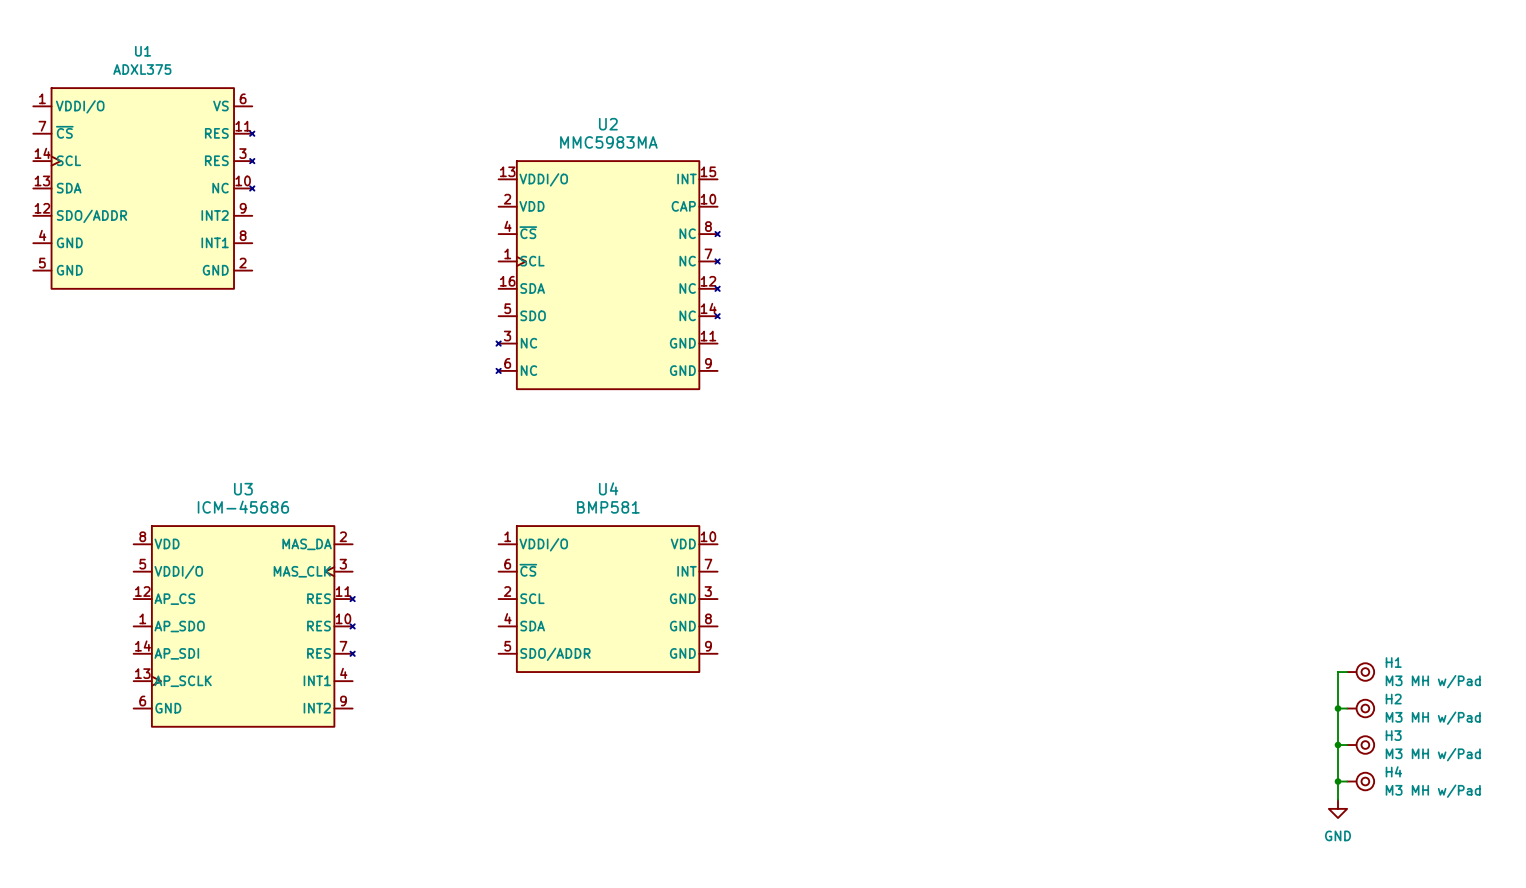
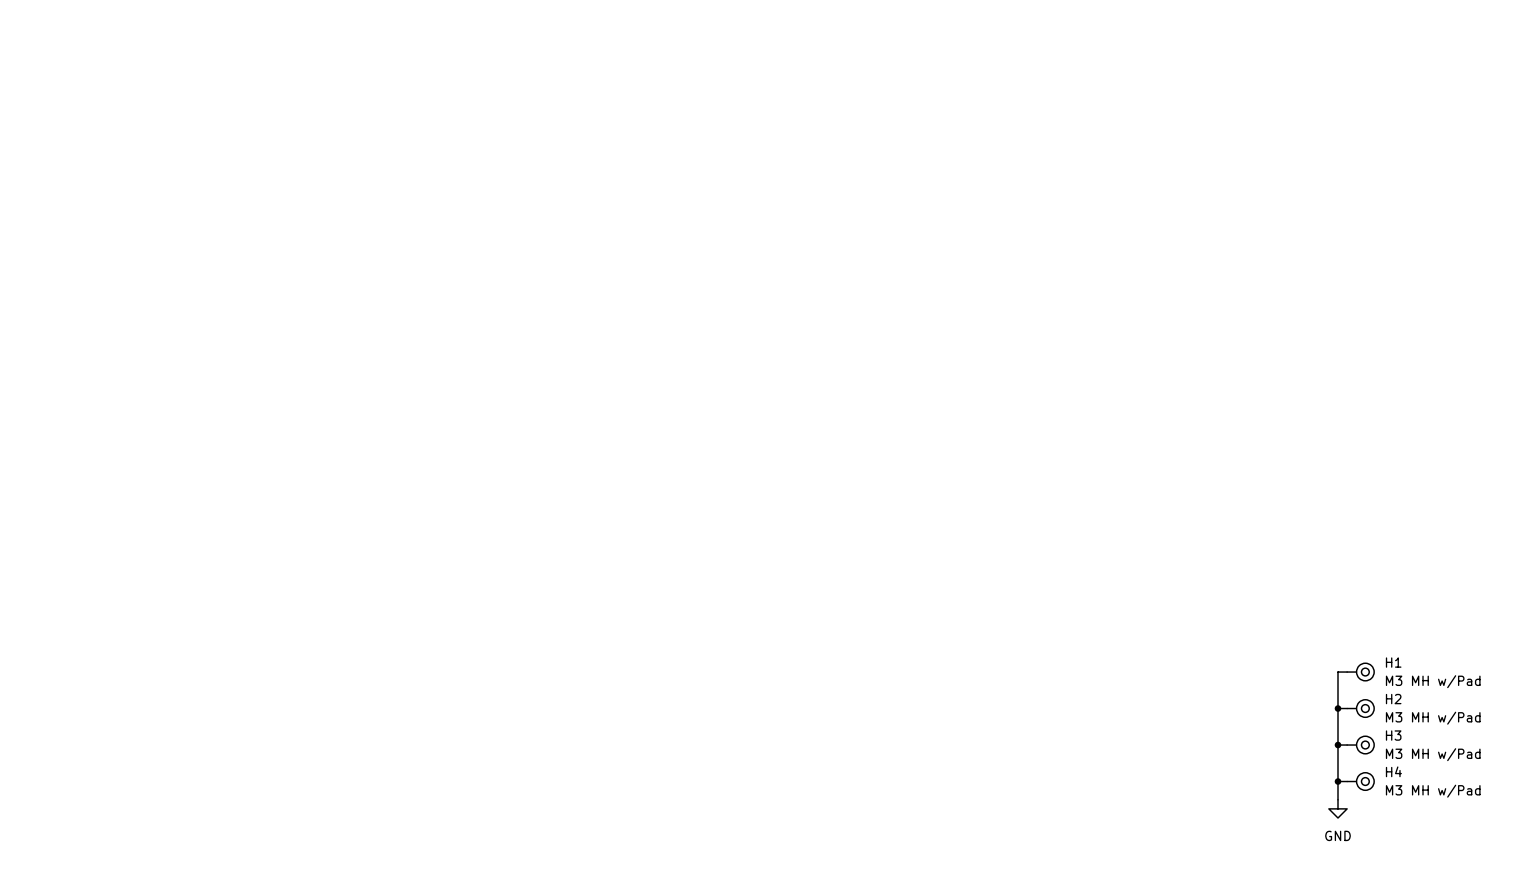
U1: ADXL375 (143, 188) -> none
U2: MMC5983MA (608, 275) -> none
U4: BMP581 (608, 599) -> none
U3: ICM-45686 (244, 626) -> none

